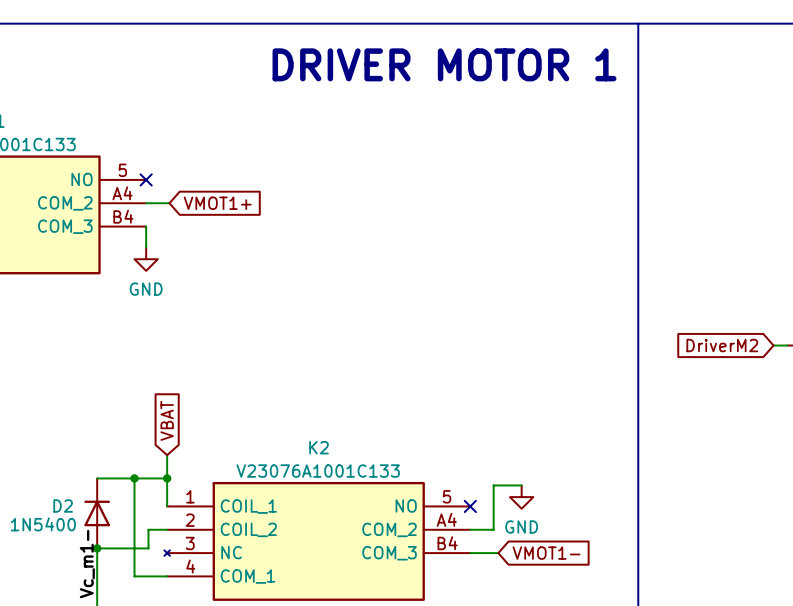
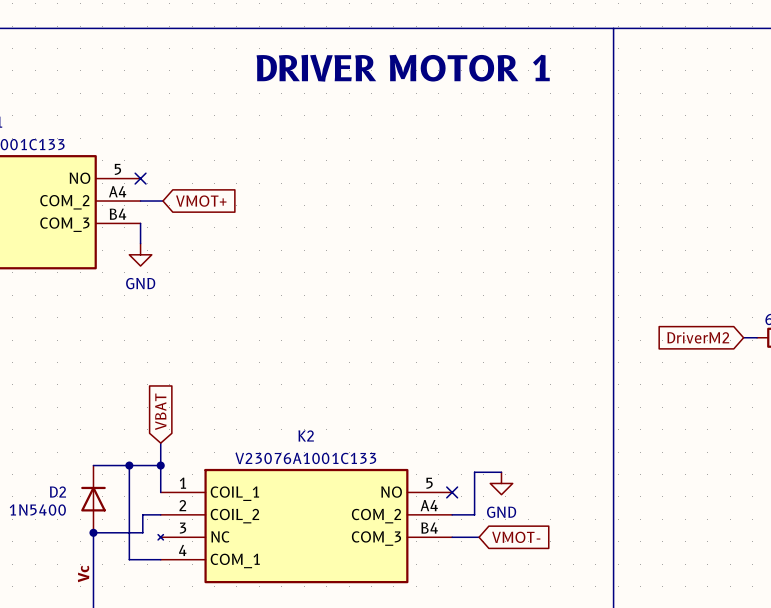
global label: VMOT1+ (217, 203) -> VMOT+ (201, 201)
global label: VMOT1- (546, 553) -> VMOT- (516, 537)
label: Vc_m1- (87, 564) -> Vc (83, 573)

